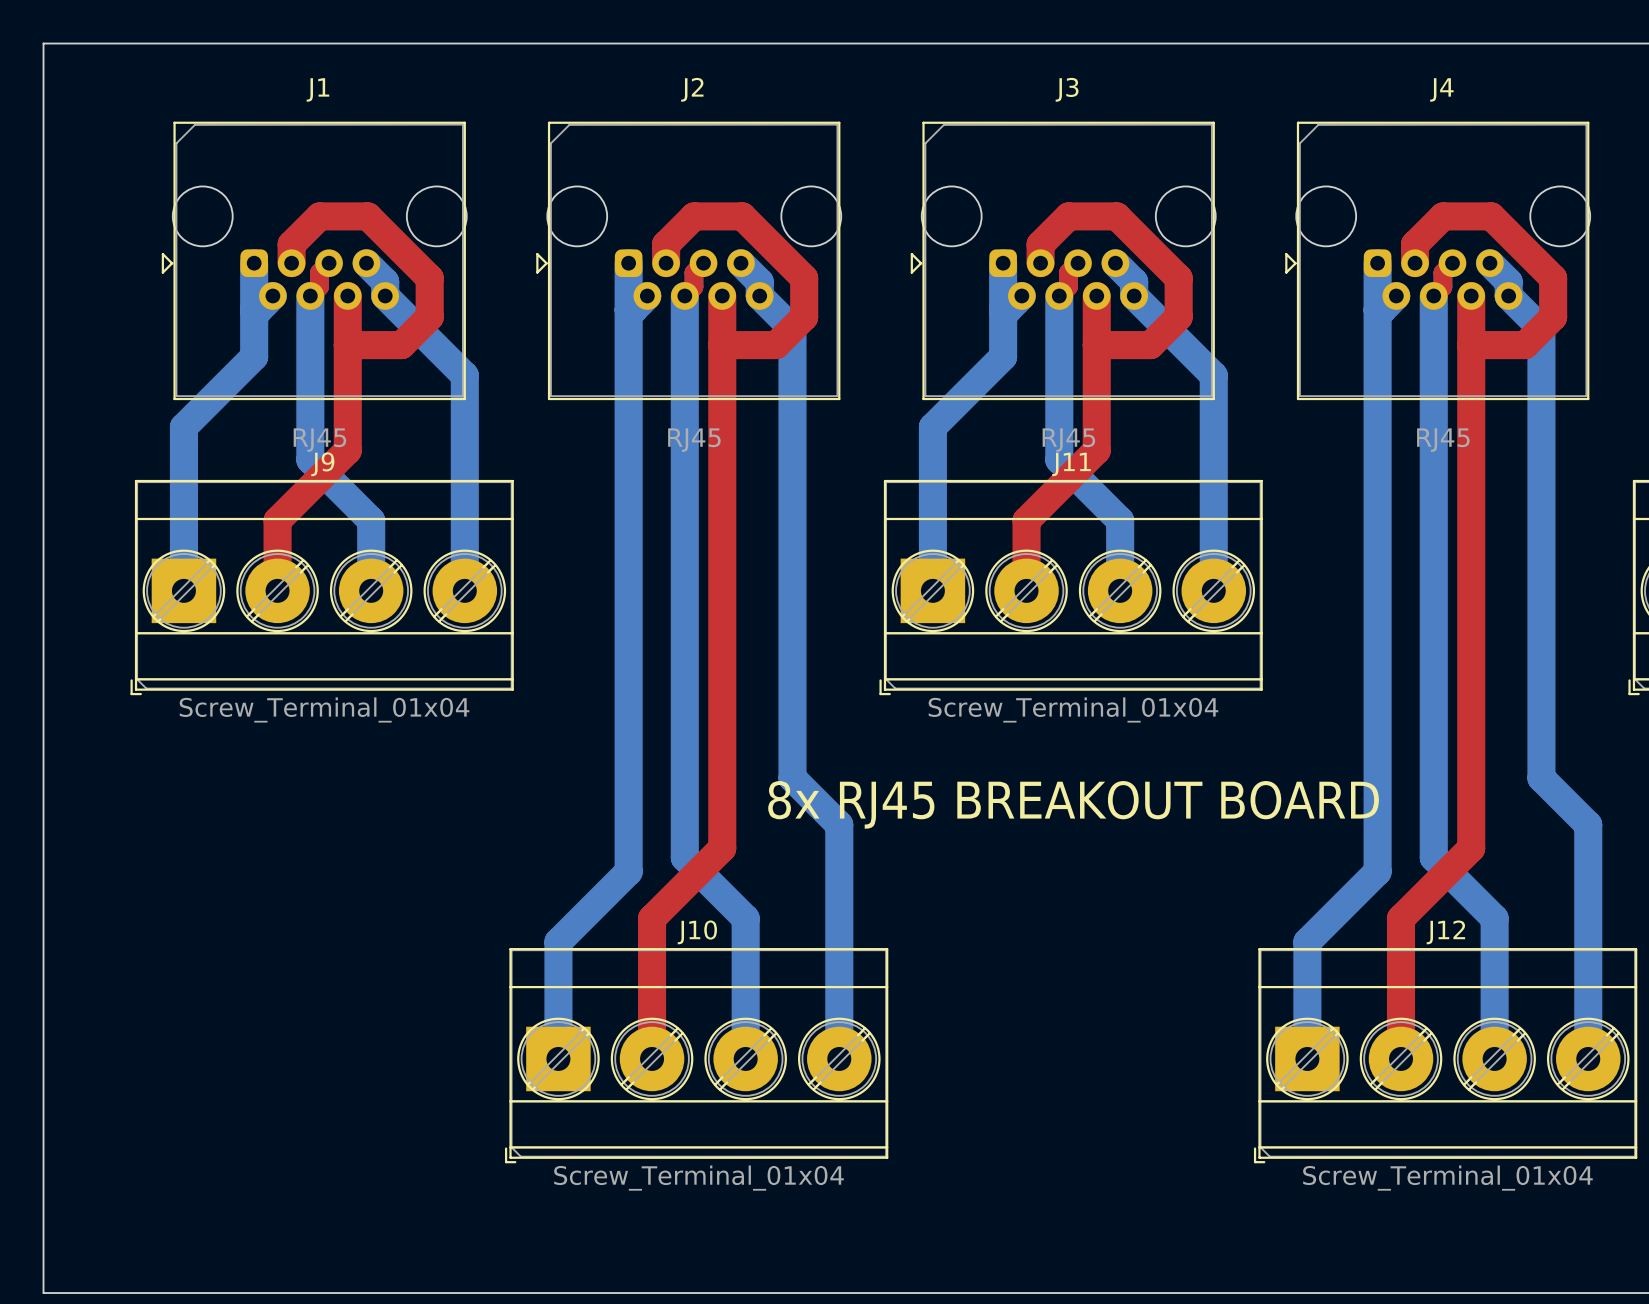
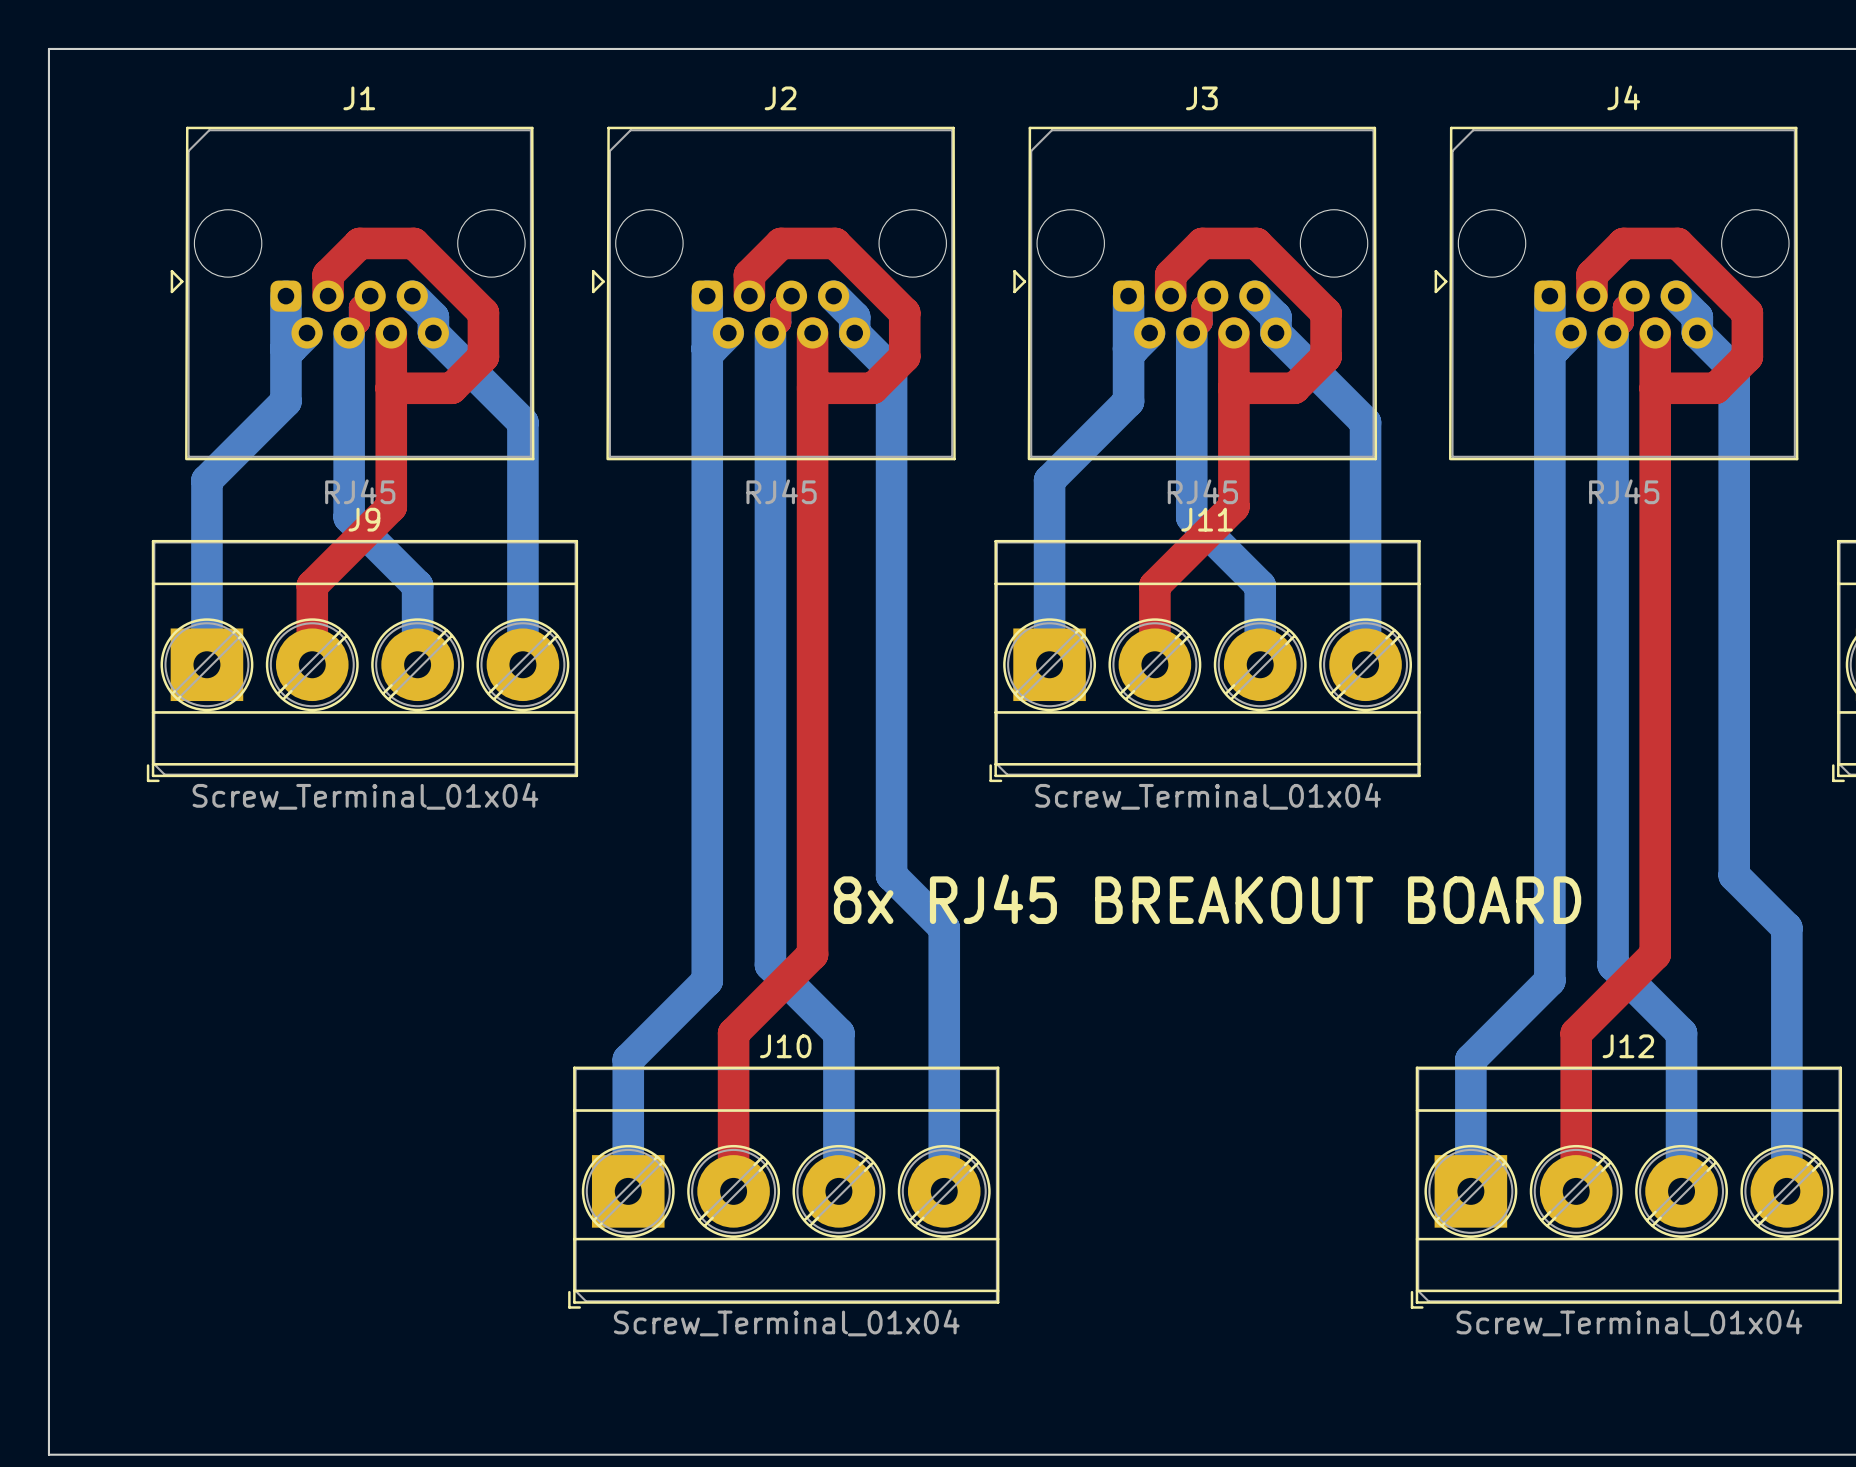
J1 footprint: [161, 121, 467, 401] -> [170, 126, 535, 461]
J2 footprint: [536, 121, 842, 401] -> [591, 126, 956, 461]
J3 footprint: [910, 121, 1216, 401] -> [1013, 126, 1378, 461]
J4 footprint: [1285, 121, 1591, 401] -> [1434, 126, 1799, 461]

